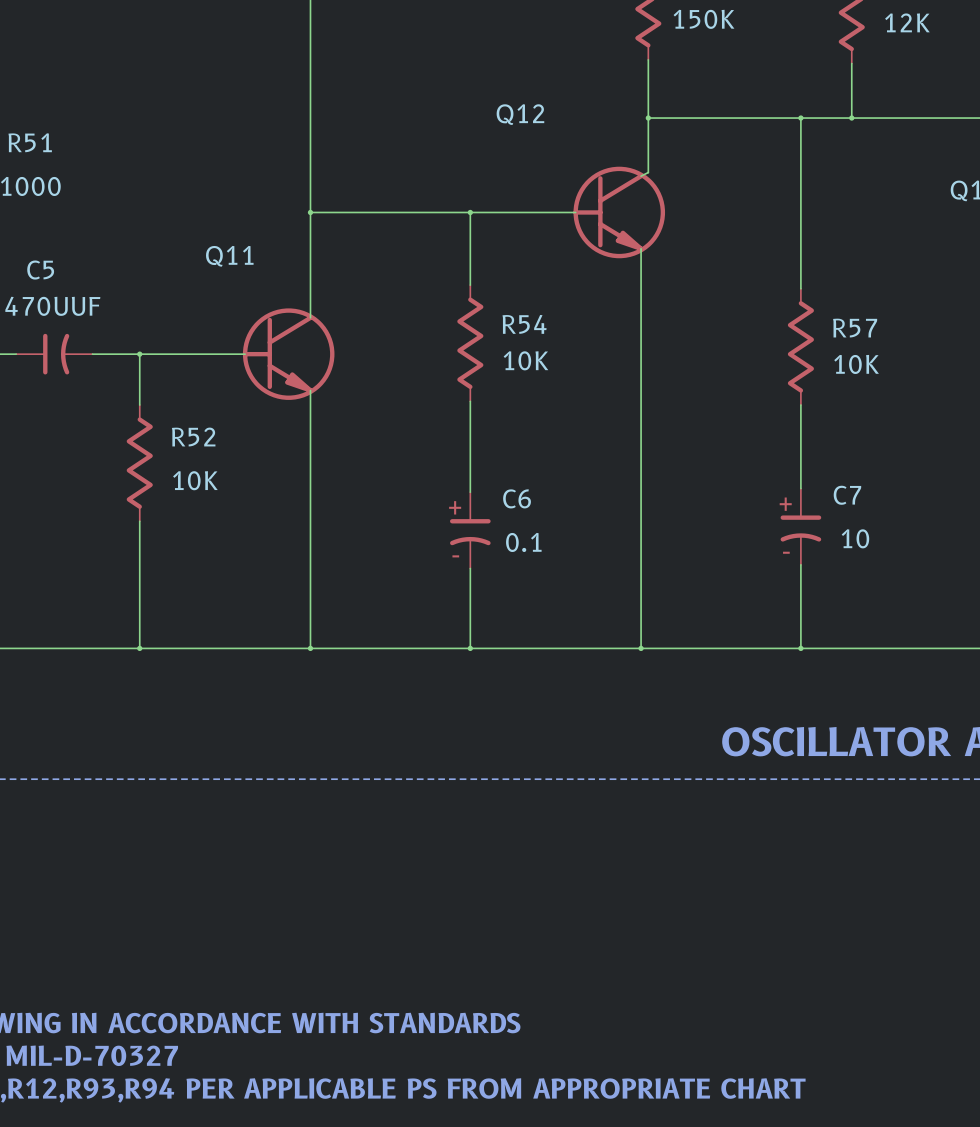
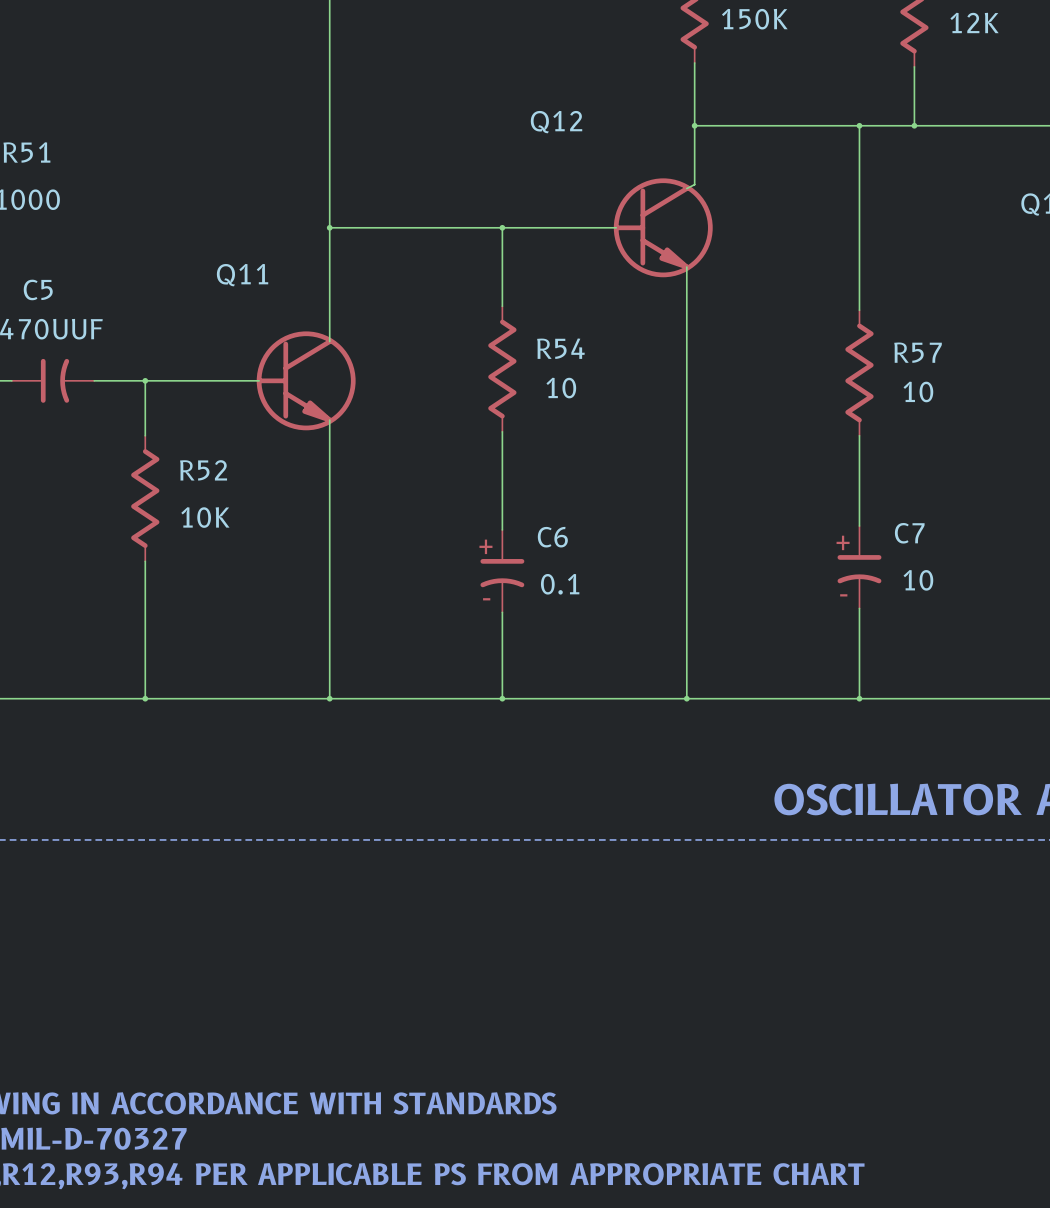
R54 value: 10K (525, 360) -> 10 (561, 388)
R57 value: 10K (856, 364) -> 10 (918, 391)

